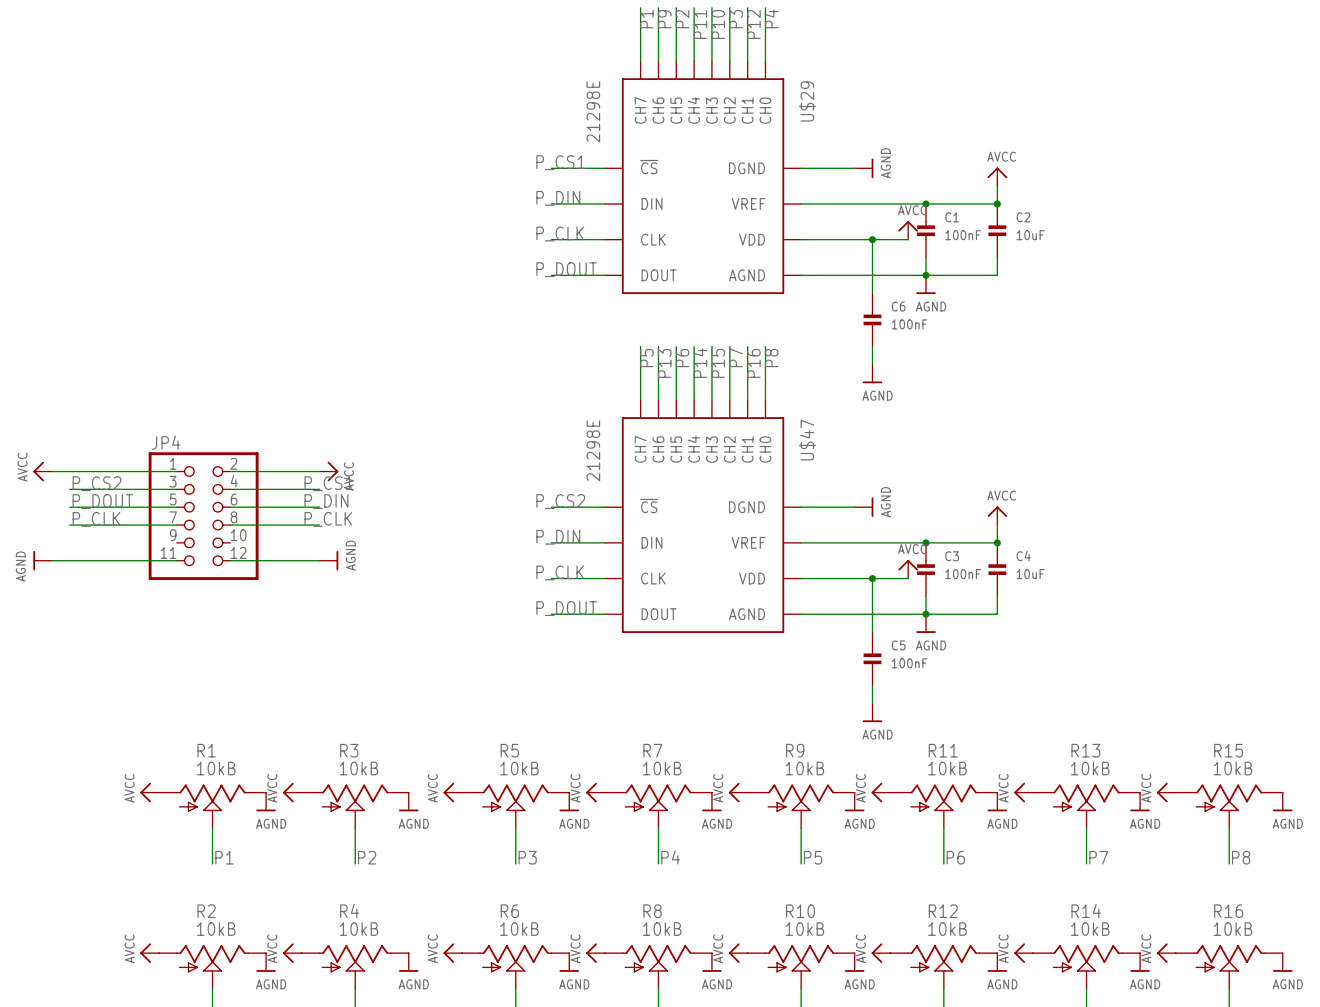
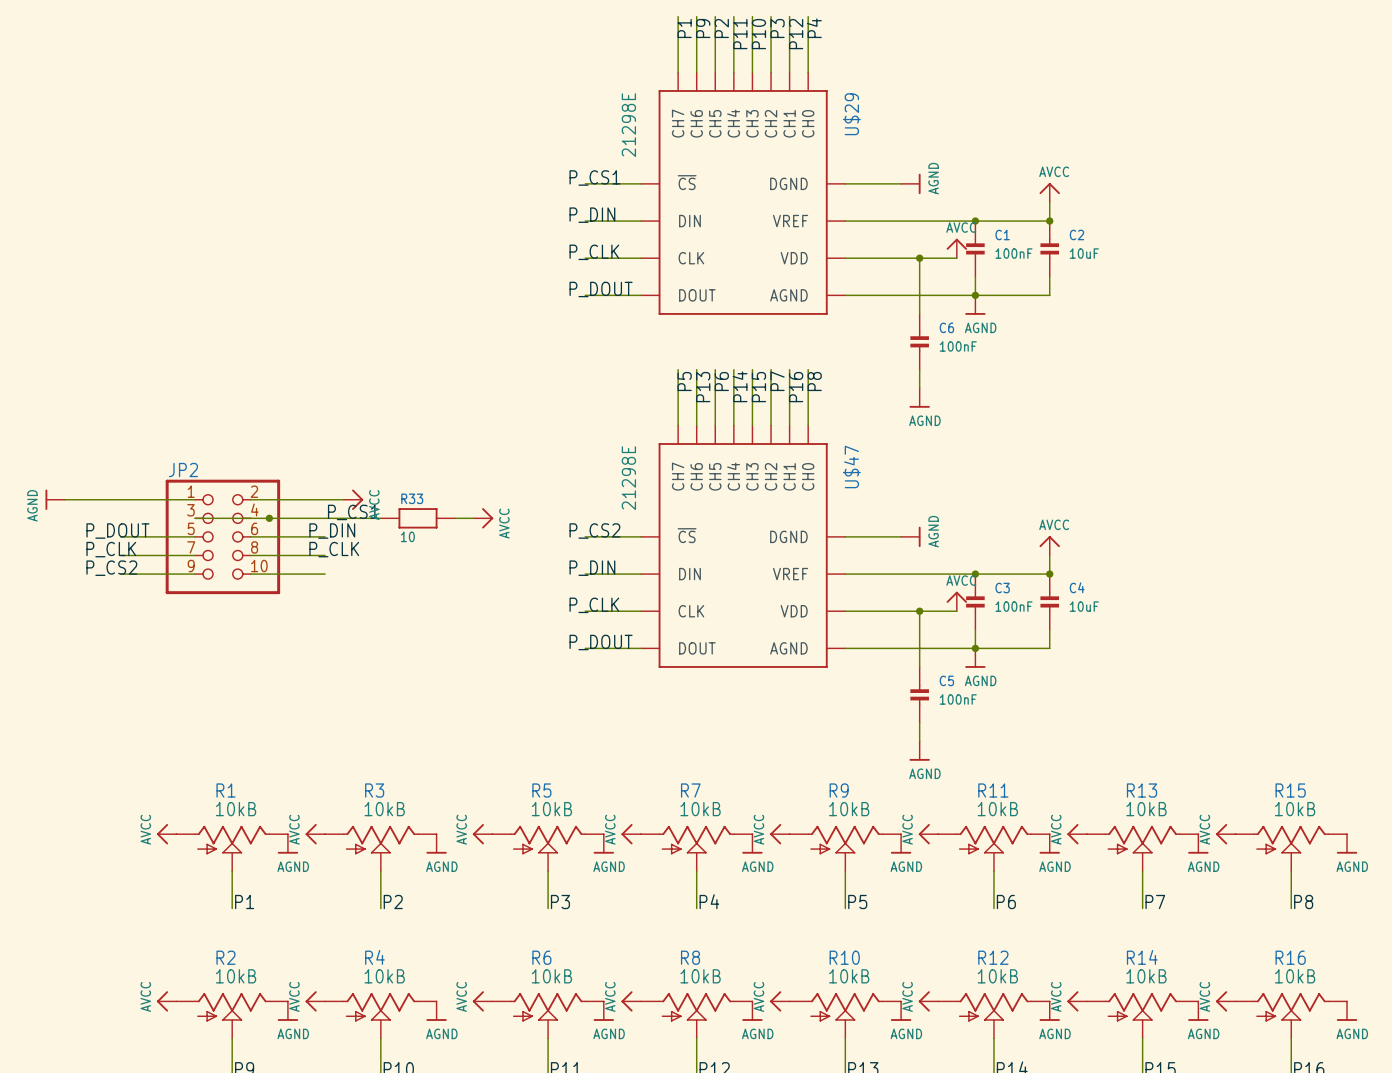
power symbol: AVCC (42, 471) -> AGND (55, 499)
label position: P_CS2 (96, 483) -> P_CS2 (111, 568)
wire: (69, 489) (176, 489) -> (250, 518) (195, 518)
junction: none -> (269, 518)
wire: none -> (343, 518) (380, 518)
R33: none -> 10 (418, 518)
power symbol: none -> AVCC (483, 518)
label position: P_DIN (326, 501) -> P_DIN (332, 531)
wire: (69, 507) (105, 507) -> none
JP2: none -> (222, 536)
wire: (301, 507) (319, 507) -> (455, 518) (473, 518)
JP4: (203, 516) -> none
label position: P_CLK (328, 519) -> P_CLK (334, 549)
wire: (69, 525) (105, 525) -> none
wire: (301, 525) (319, 525) -> none
wire: none -> (120, 574) (195, 574)
wire: none -> (250, 574) (325, 574)
power symbol: AGND (42, 560) -> none
wire: (52, 560) (176, 560) -> none
wire: (230, 560) (319, 560) -> none
power symbol: AGND (328, 560) -> none

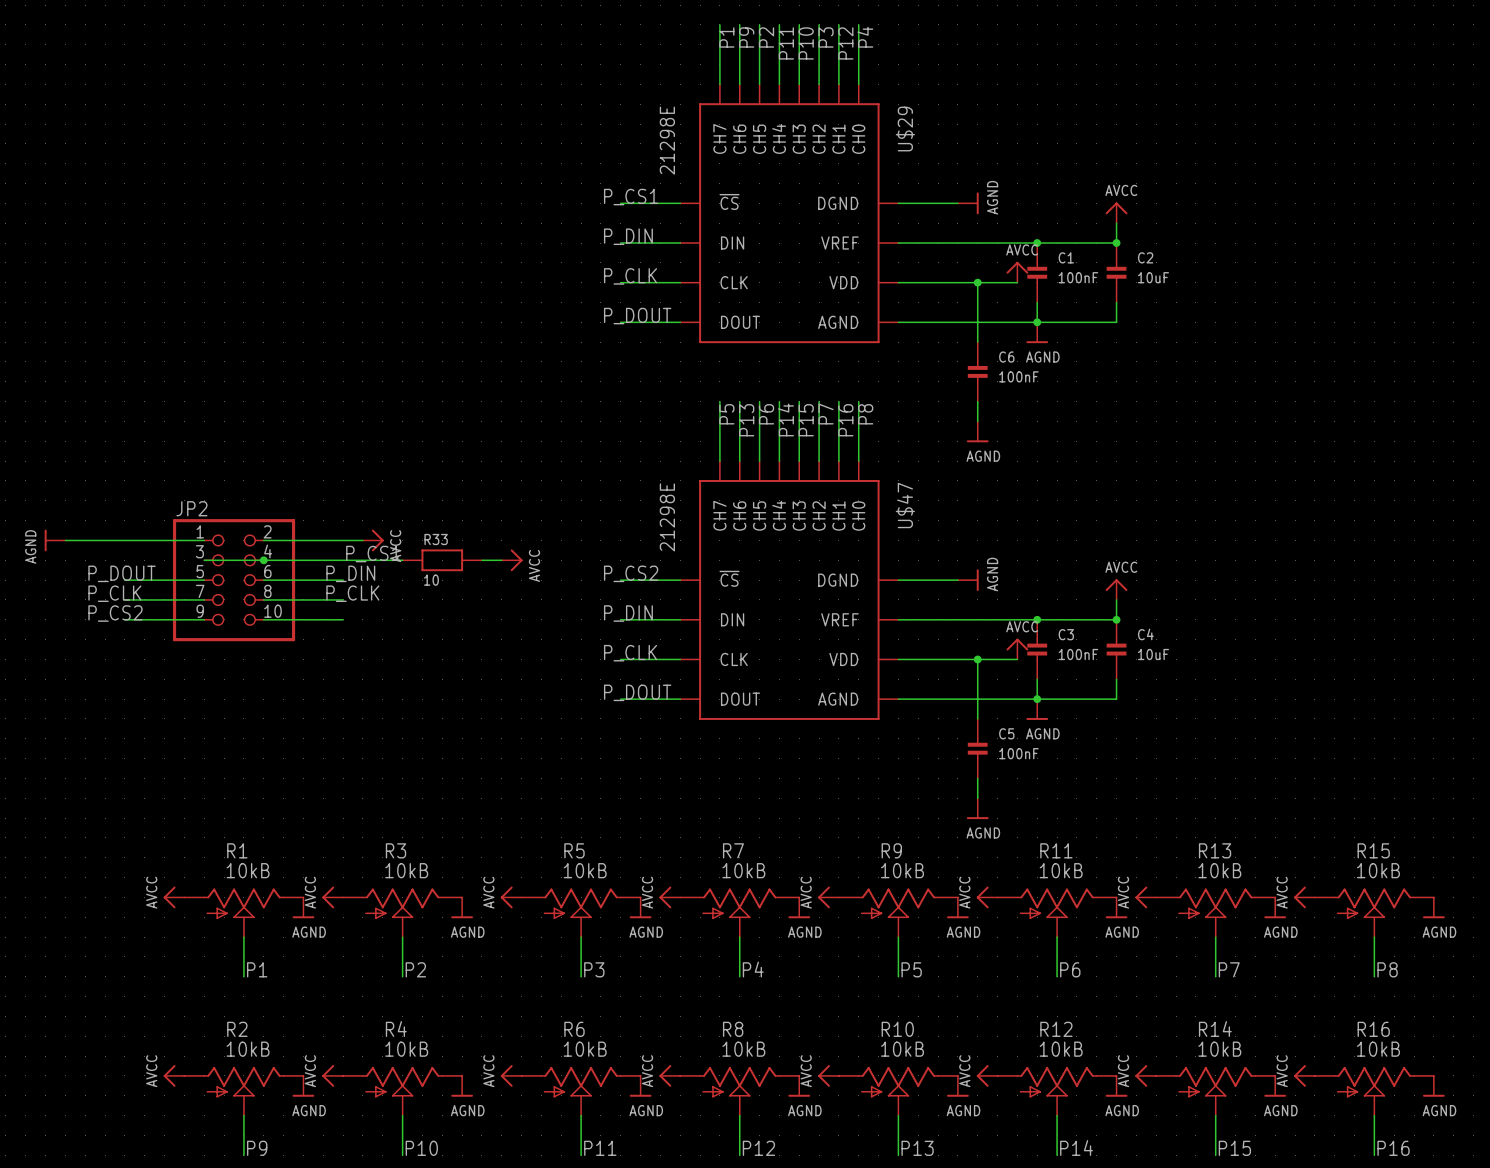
junction position: (269, 518) -> (263, 560)

